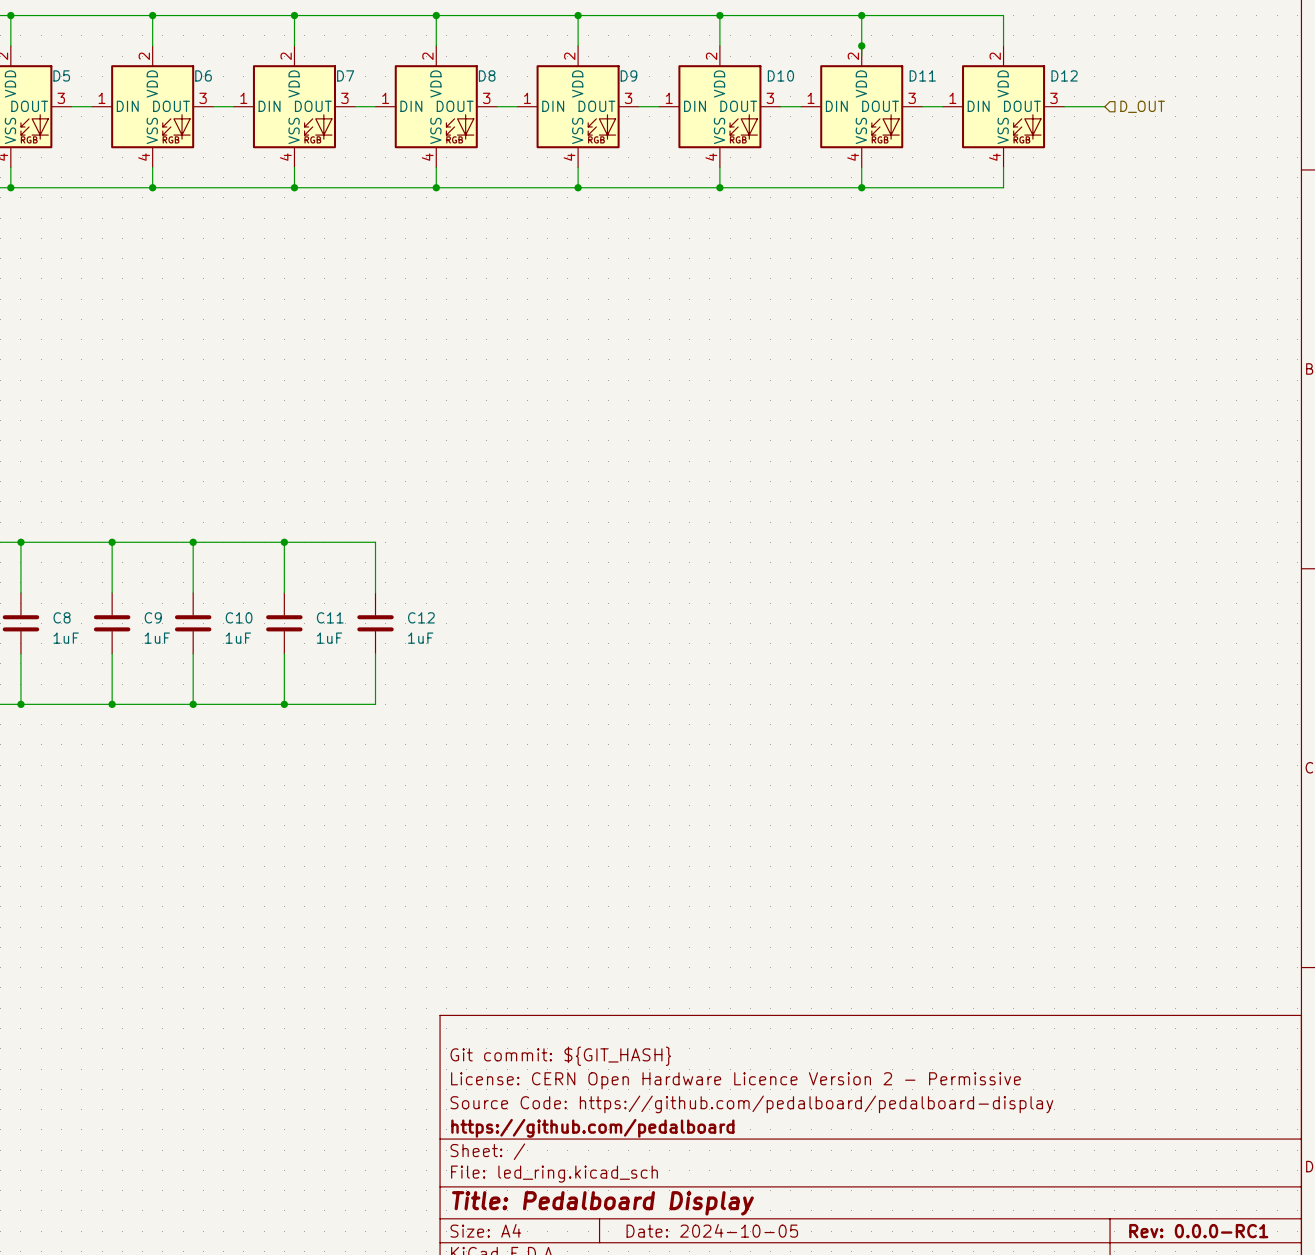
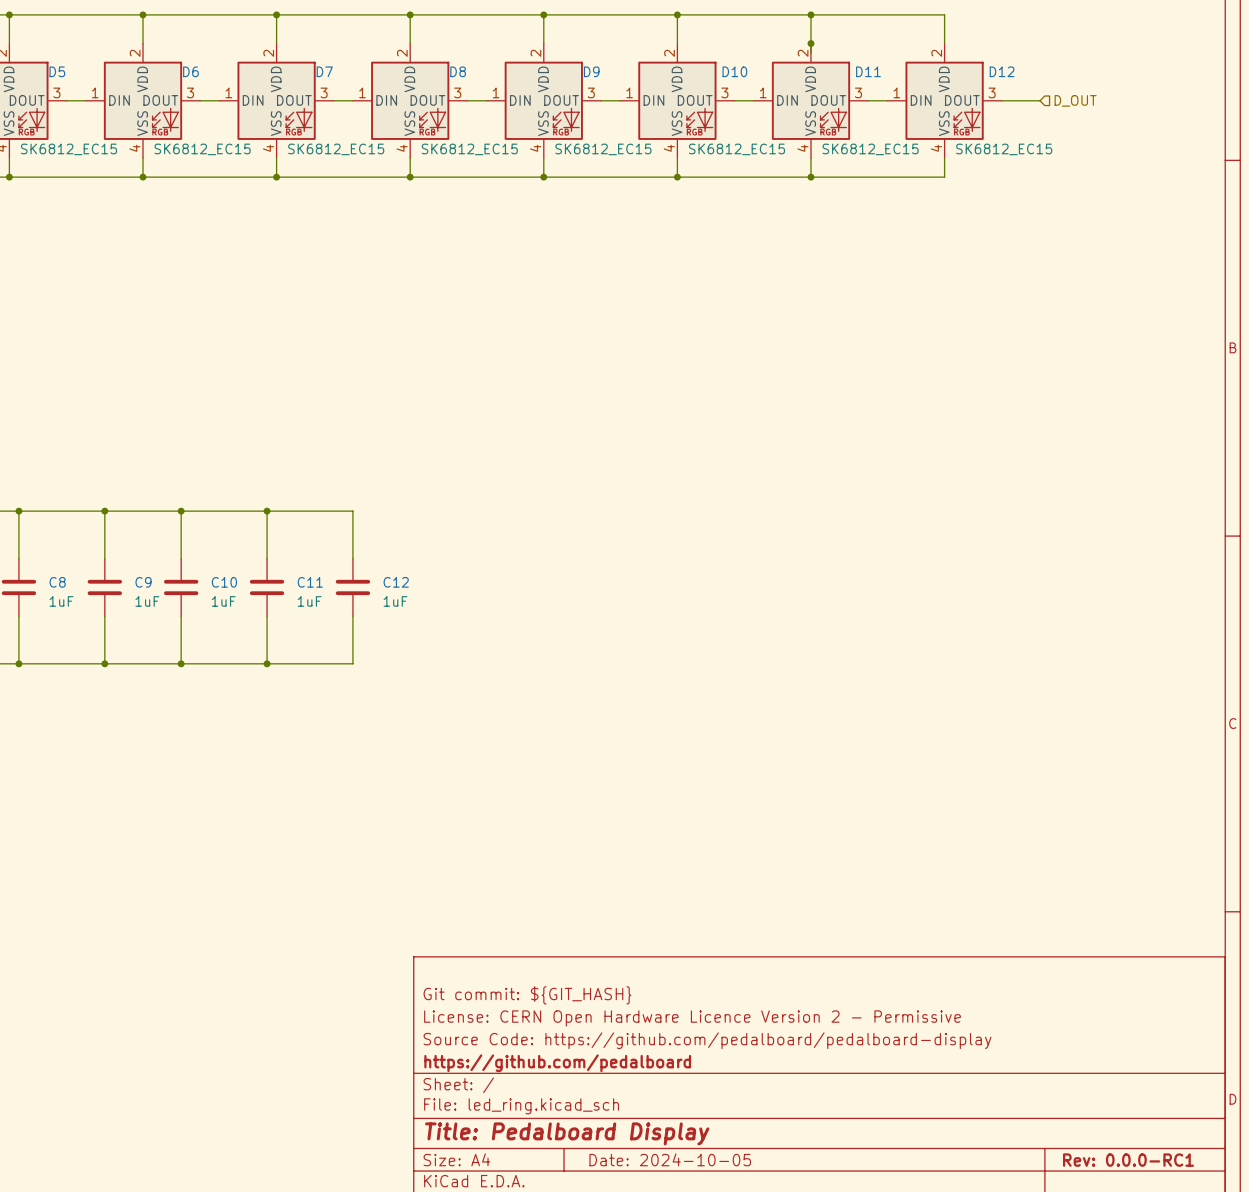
D5 value: none -> SK6812_EC15 (68, 149)
D6 value: none -> SK6812_EC15 (202, 149)
D7 value: none -> SK6812_EC15 (336, 149)
D8 value: none -> SK6812_EC15 (469, 149)
D9 value: none -> SK6812_EC15 (603, 149)
D10 value: none -> SK6812_EC15 (736, 149)
D11 value: none -> SK6812_EC15 (870, 149)
D12 value: none -> SK6812_EC15 (1004, 149)

